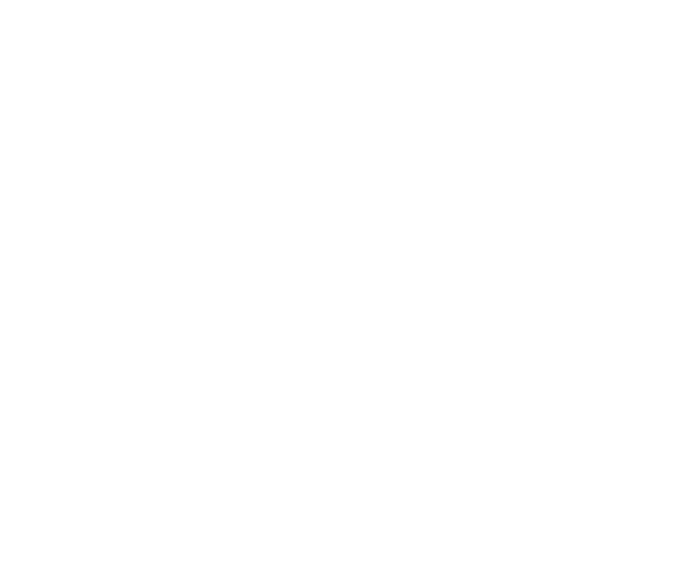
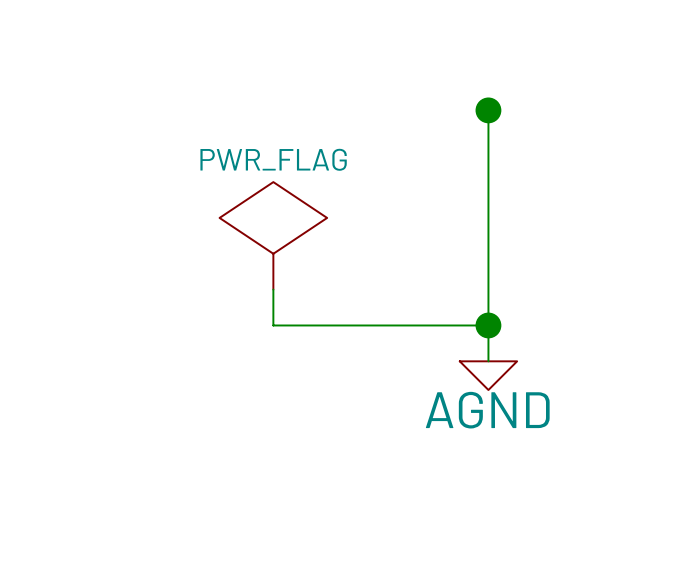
wire: none -> (488, 110) (488, 361)
junction: none -> (488, 110)
power symbol: none -> PWR_FLAG (273, 235)
wire: none -> (273, 289) (273, 325) (488, 325)
junction: none -> (488, 325)
power symbol: none -> AGND (488, 375)

